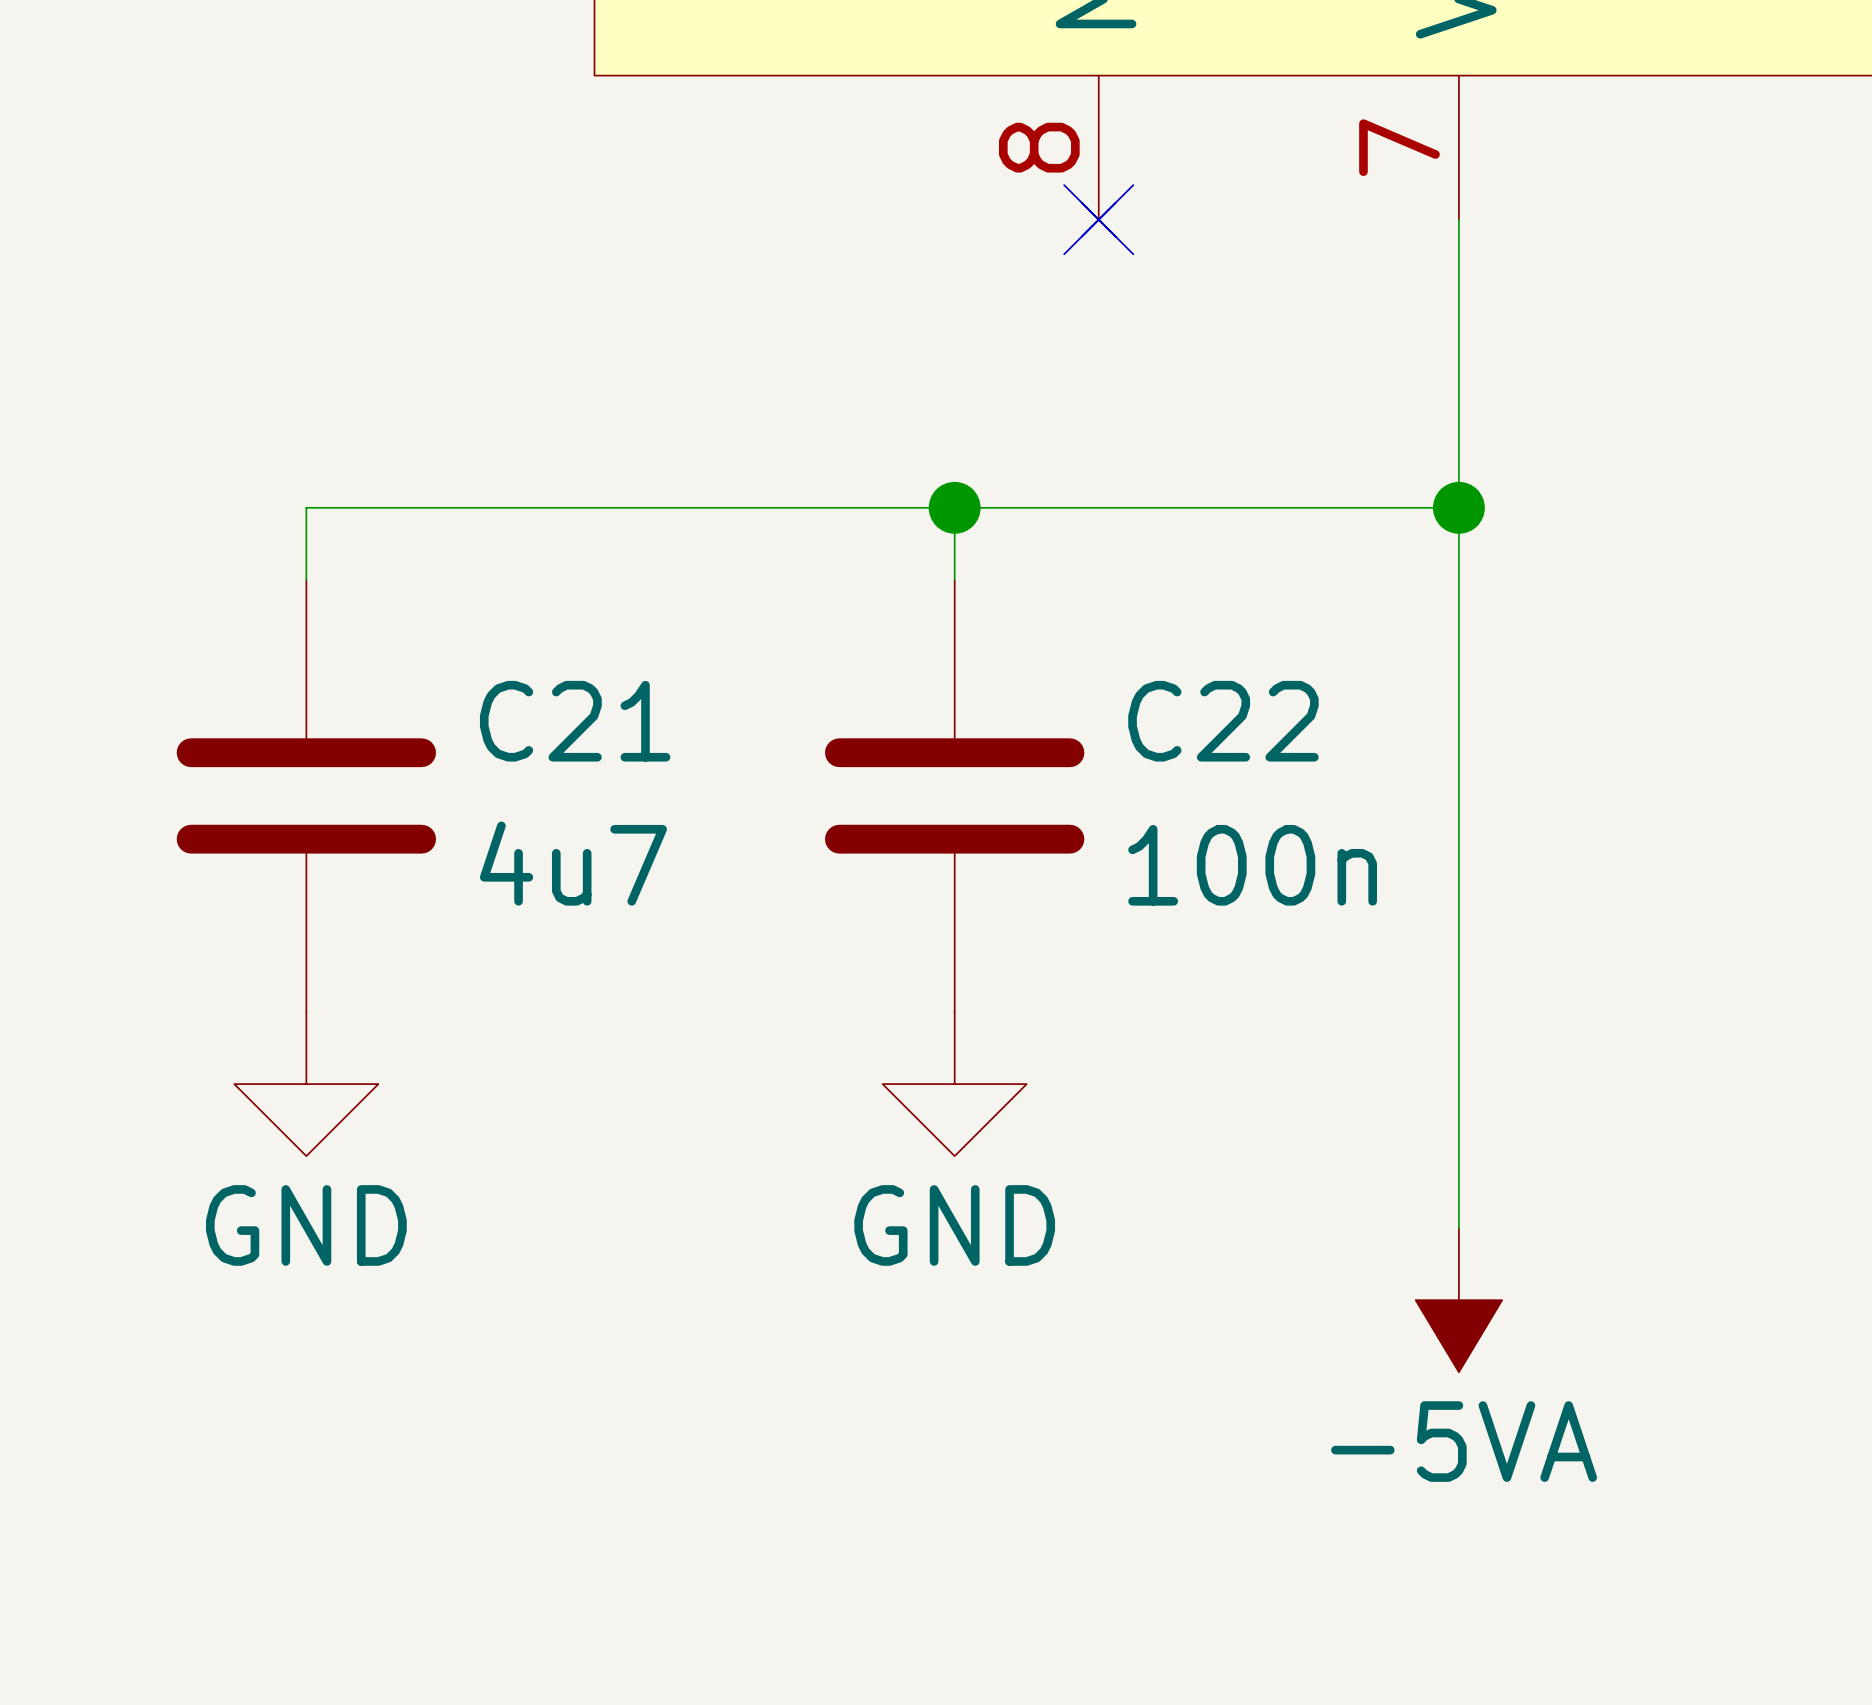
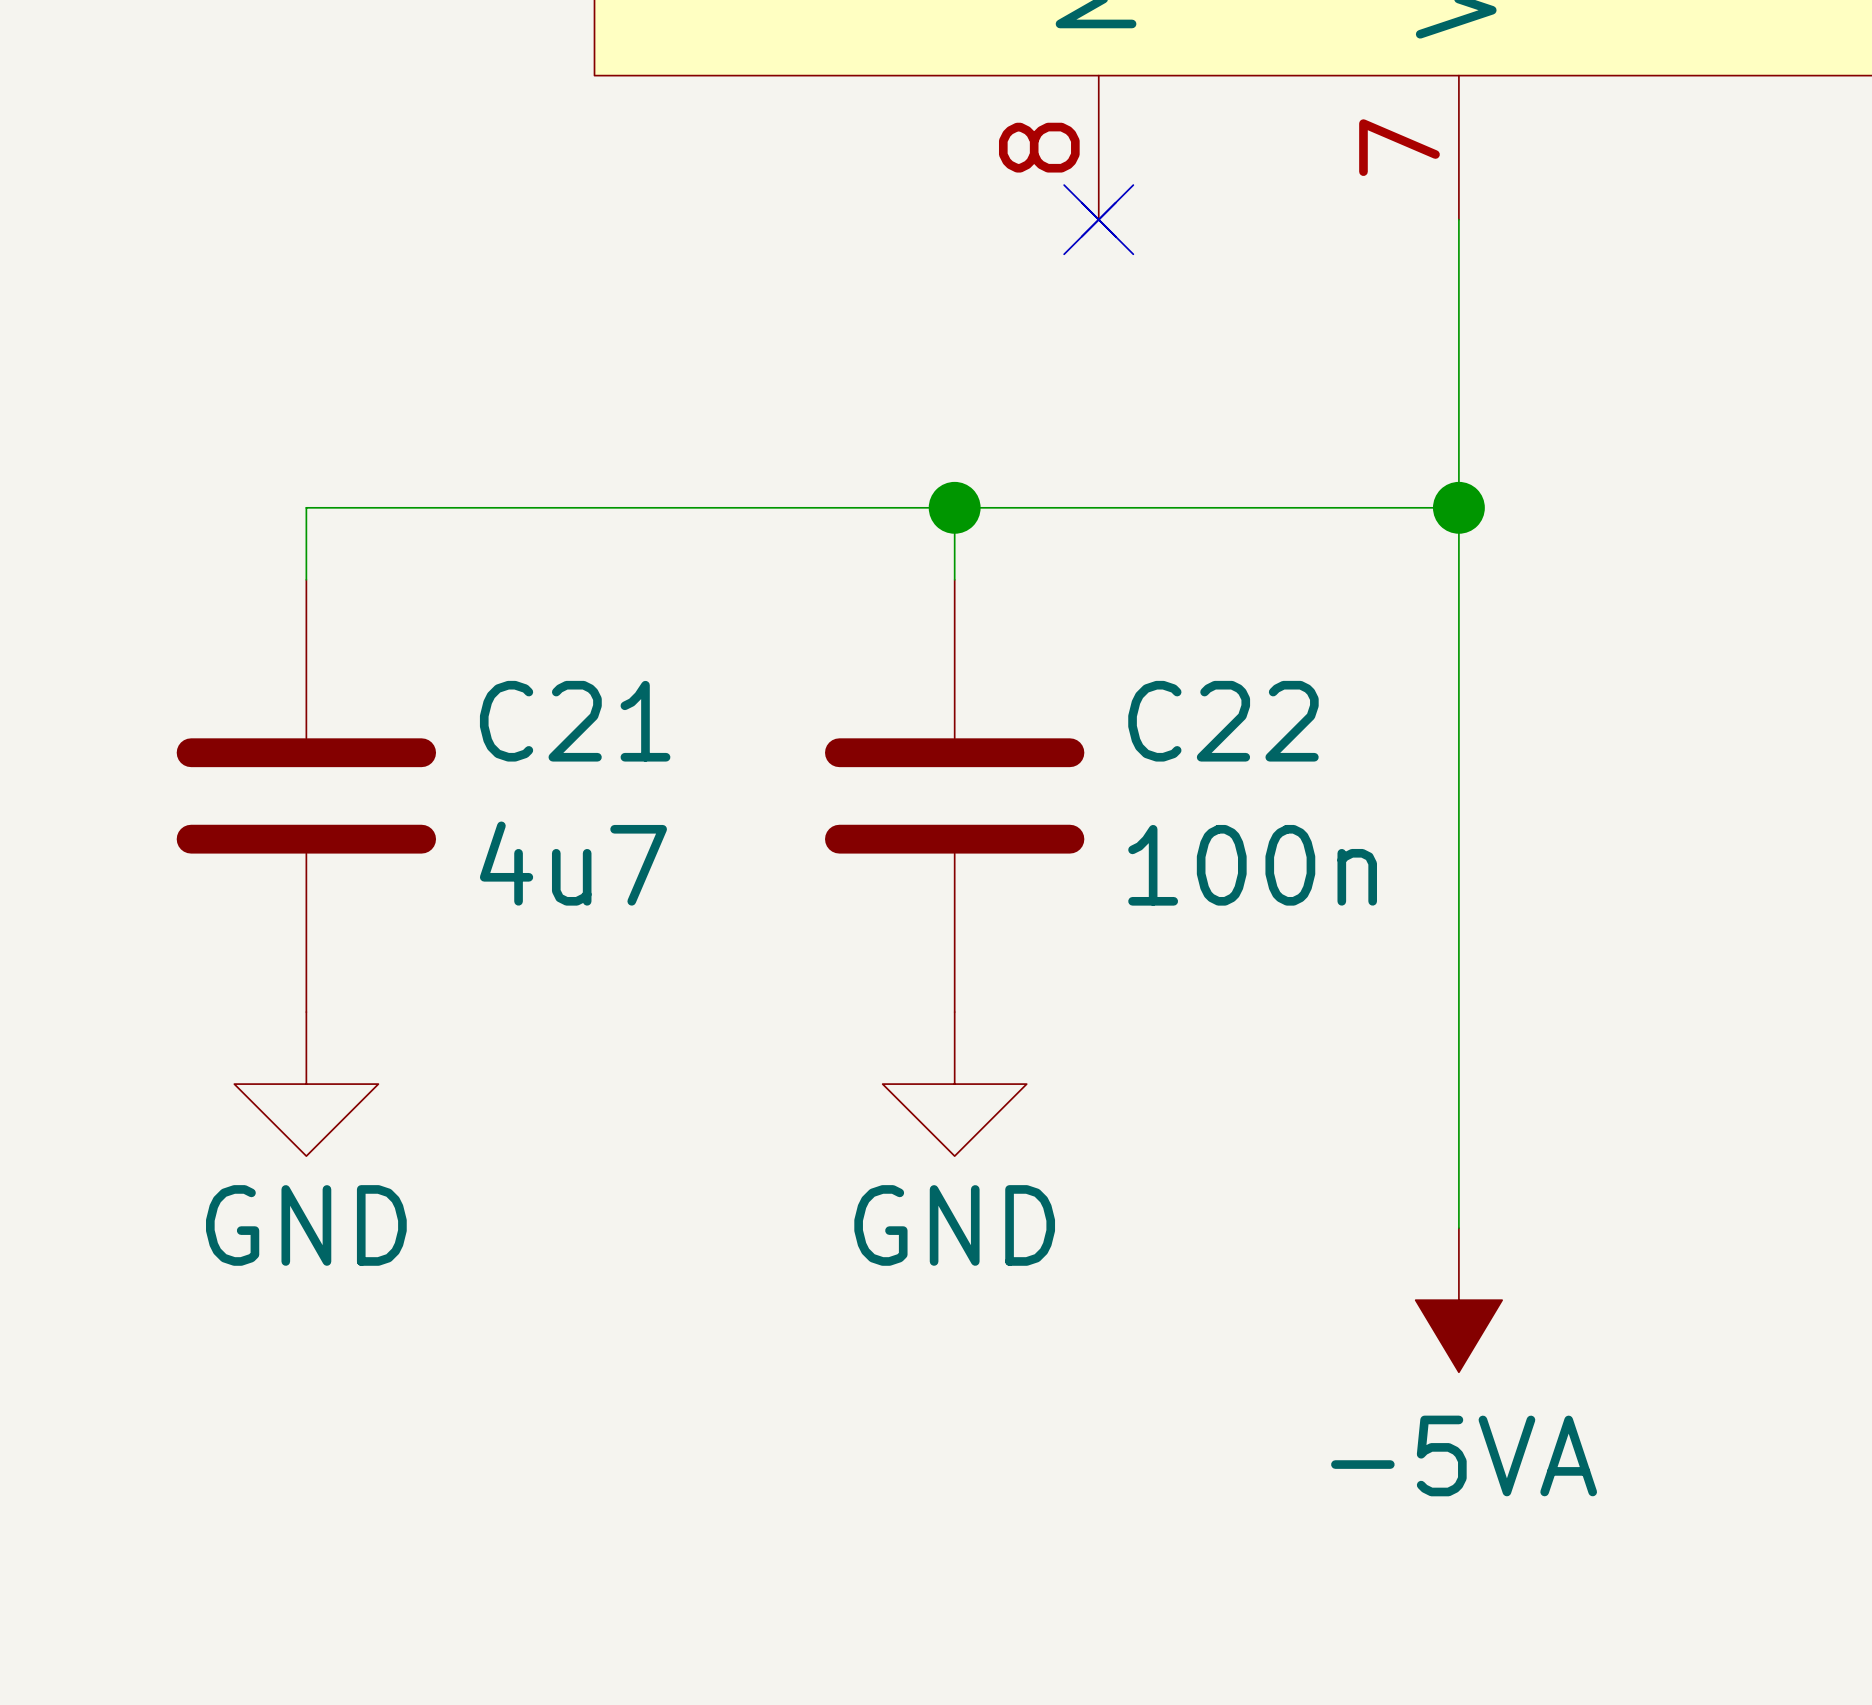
power symbol text position: -5VA (1464, 1441) -> -5VA (1464, 1455)

